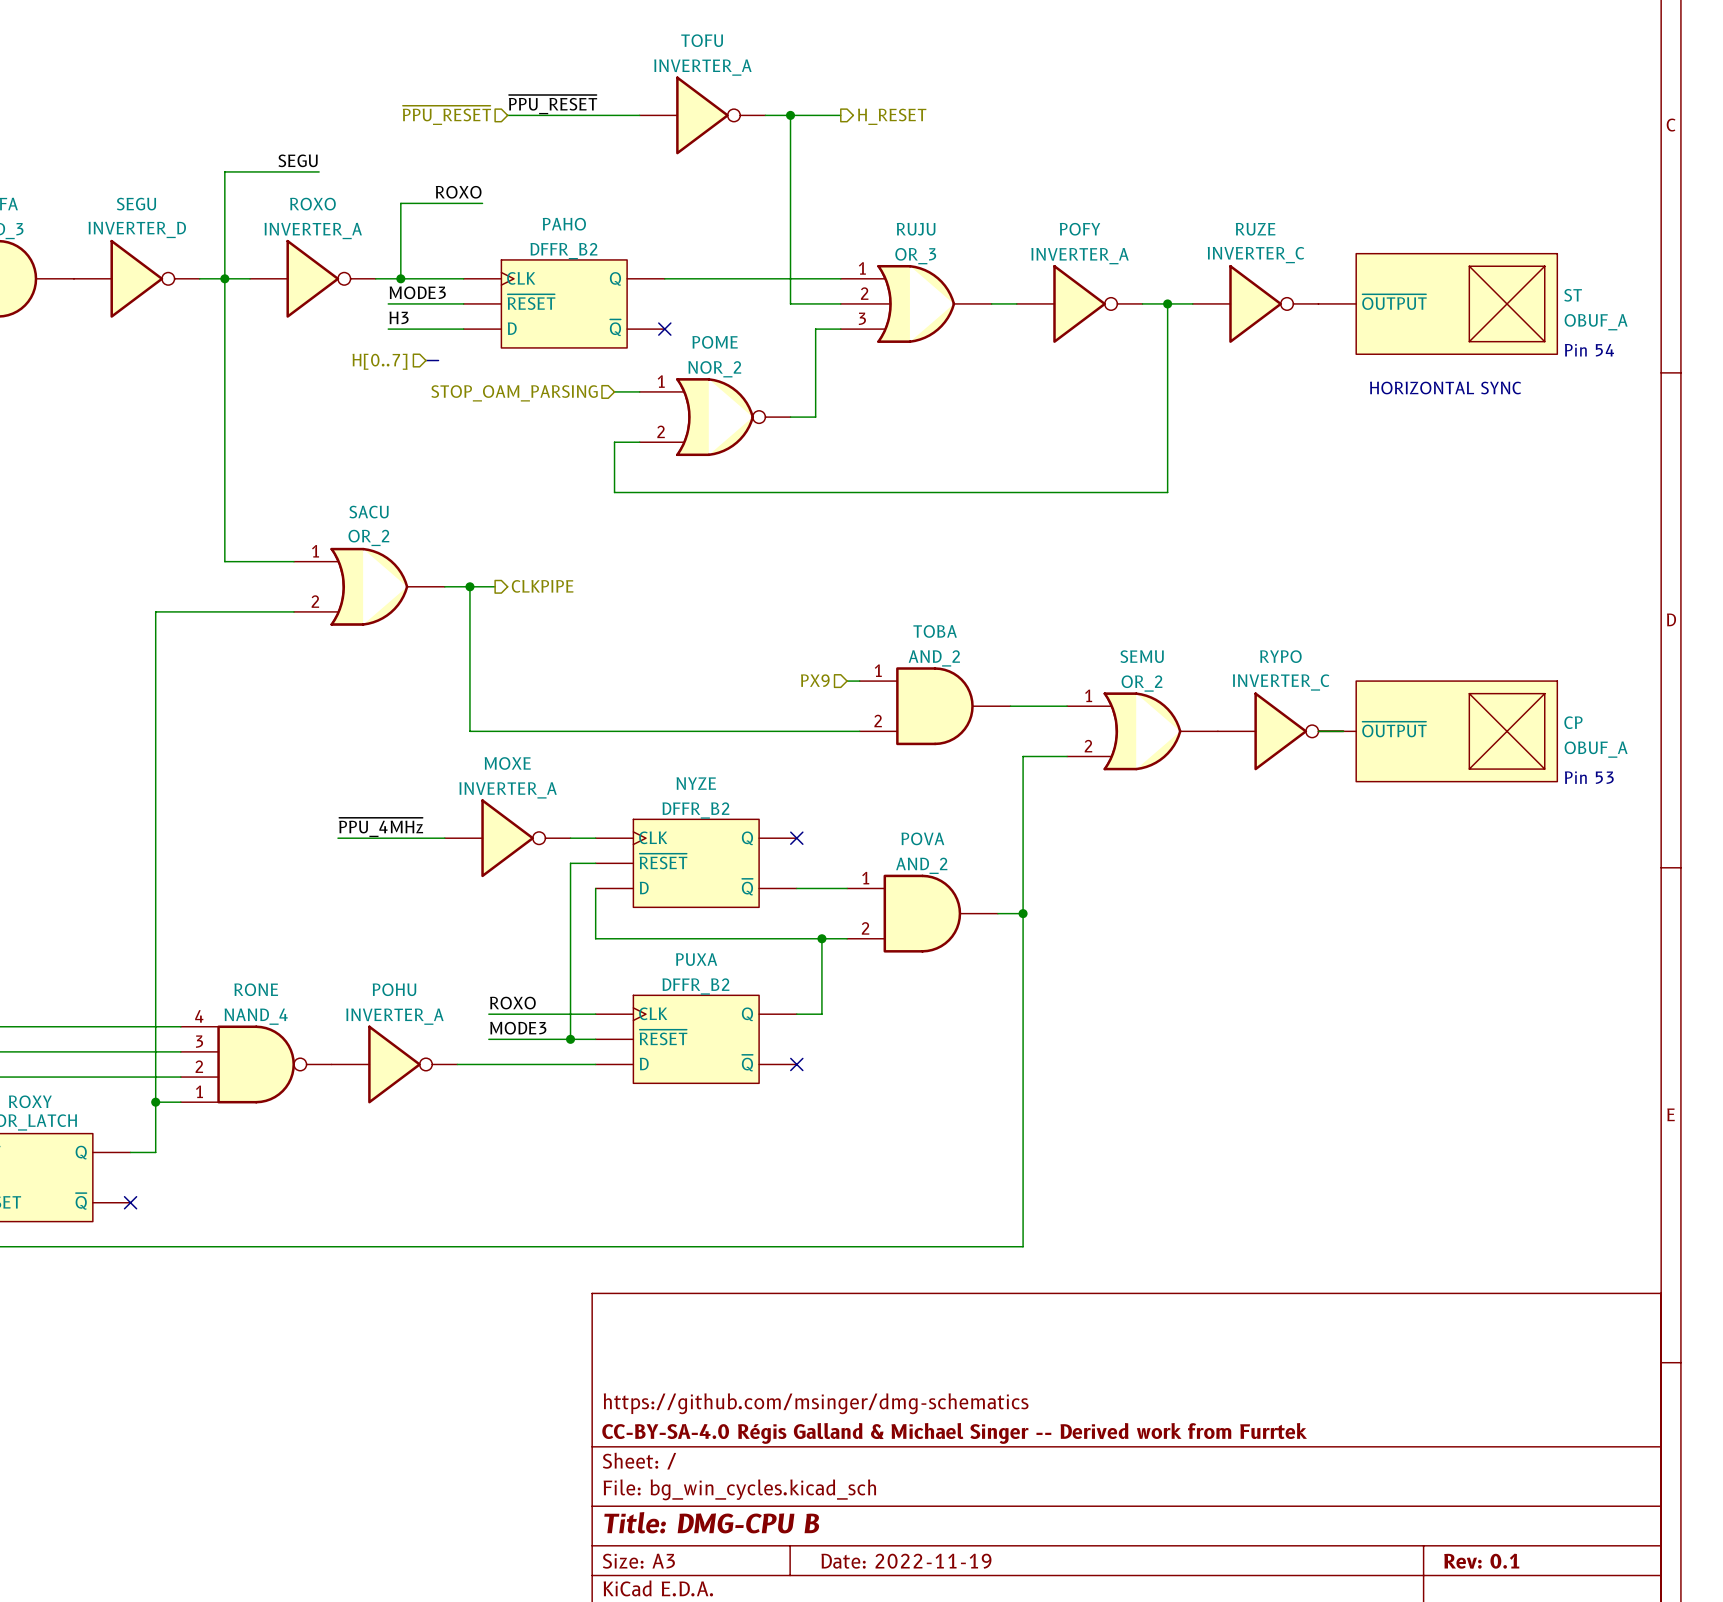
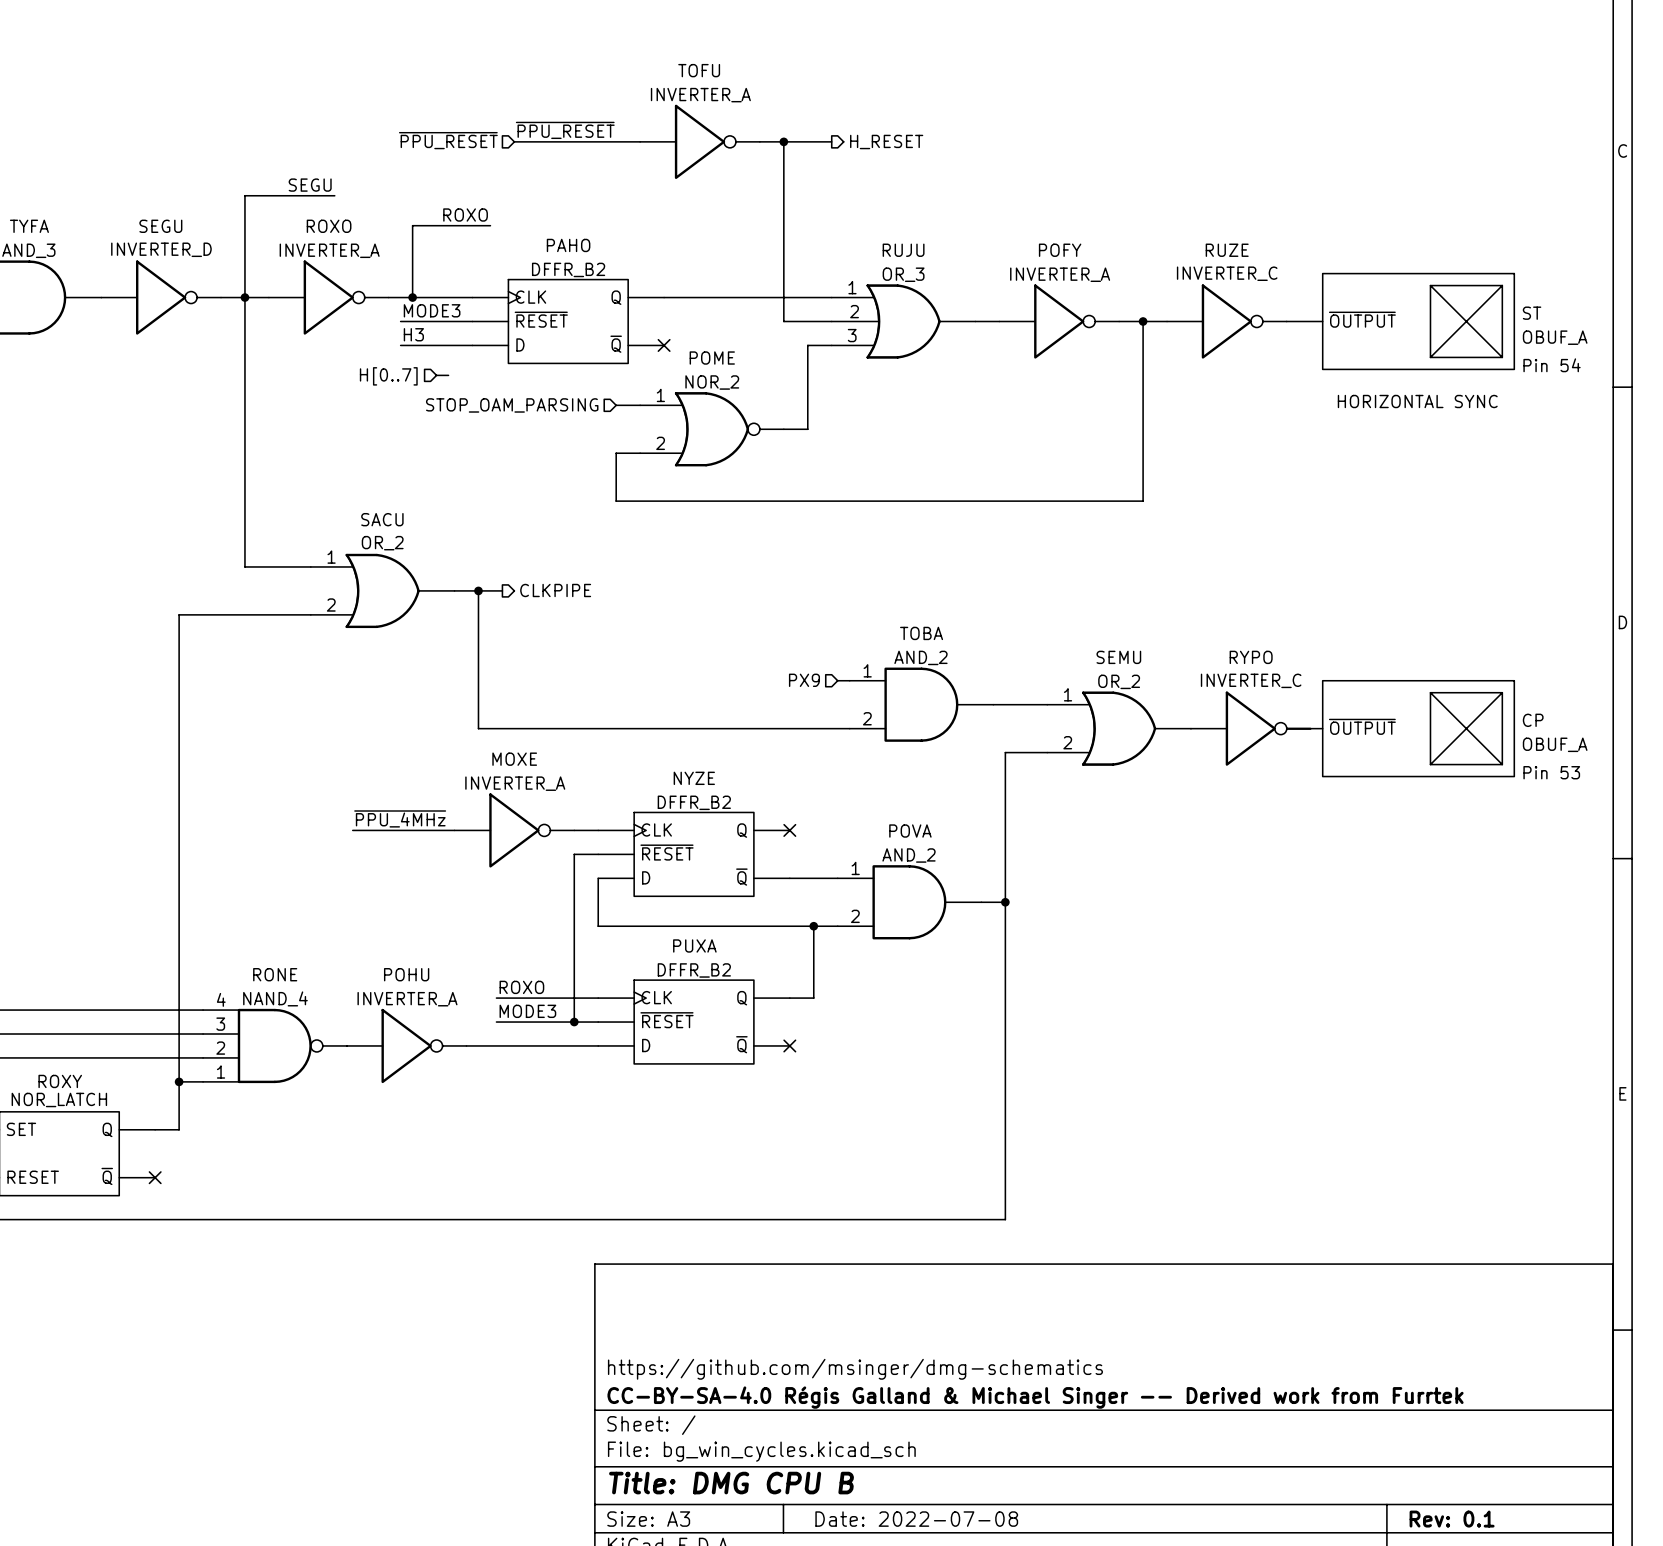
title block: Title: DMG-CPU B (711, 1522) -> Title: DMG CPU B (731, 1483)
title block: Date: 2022-11-19 (906, 1561) -> Date: 2022-07-08 (916, 1519)

